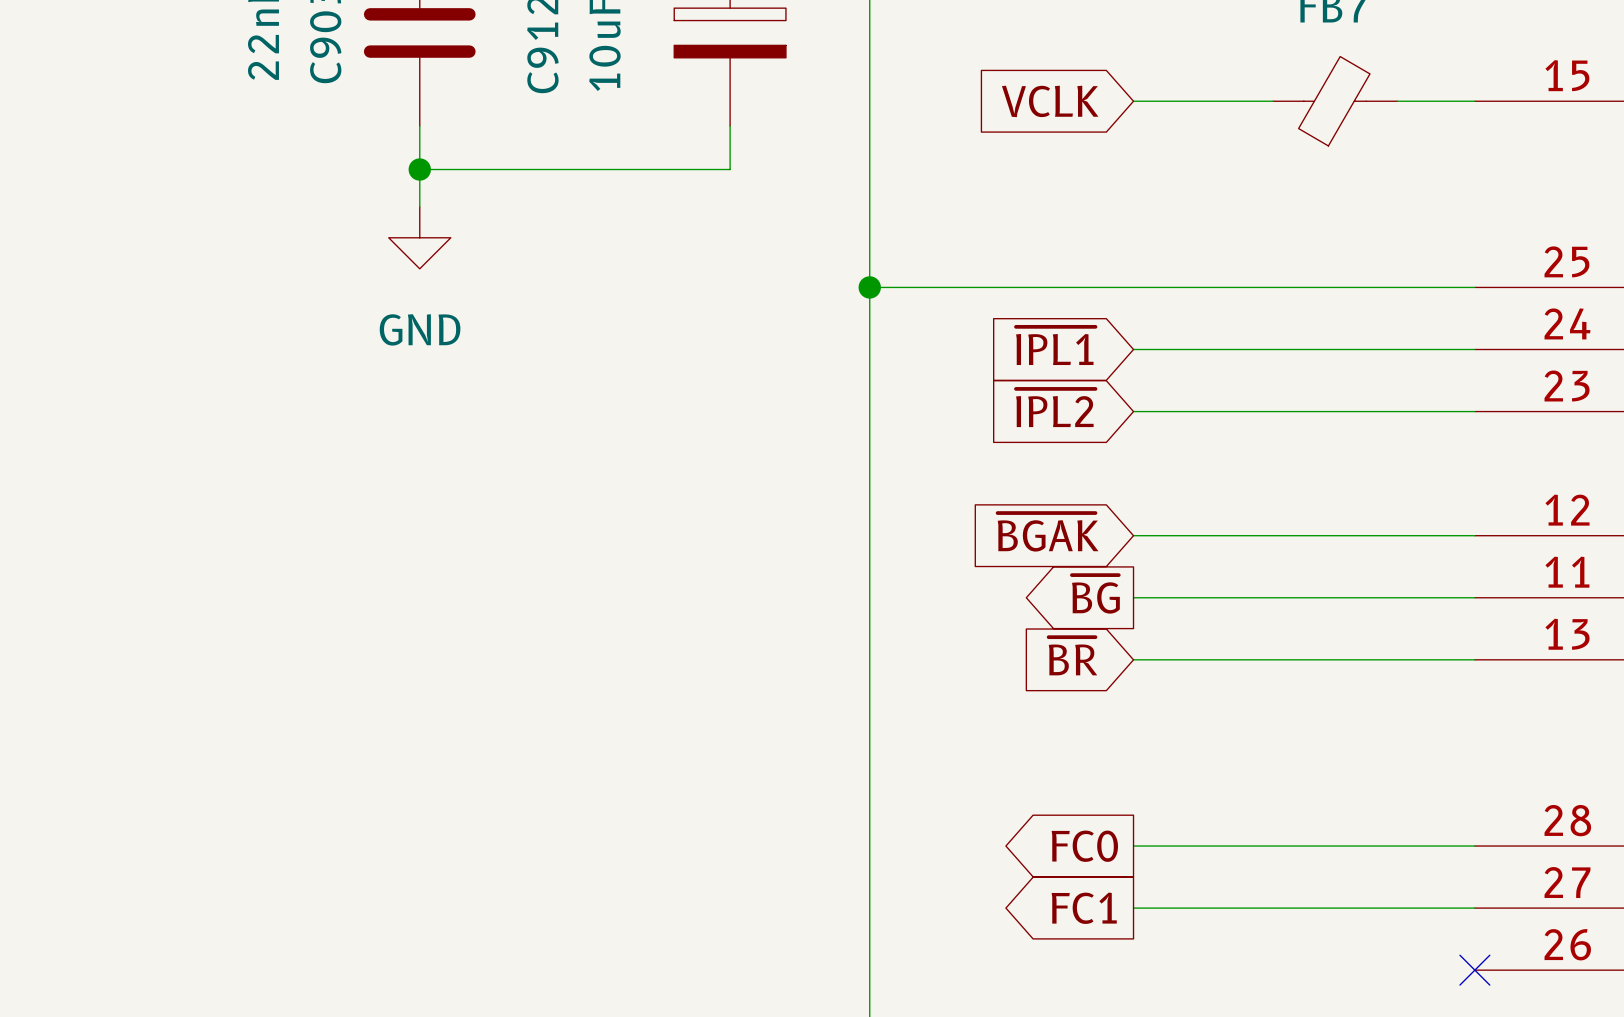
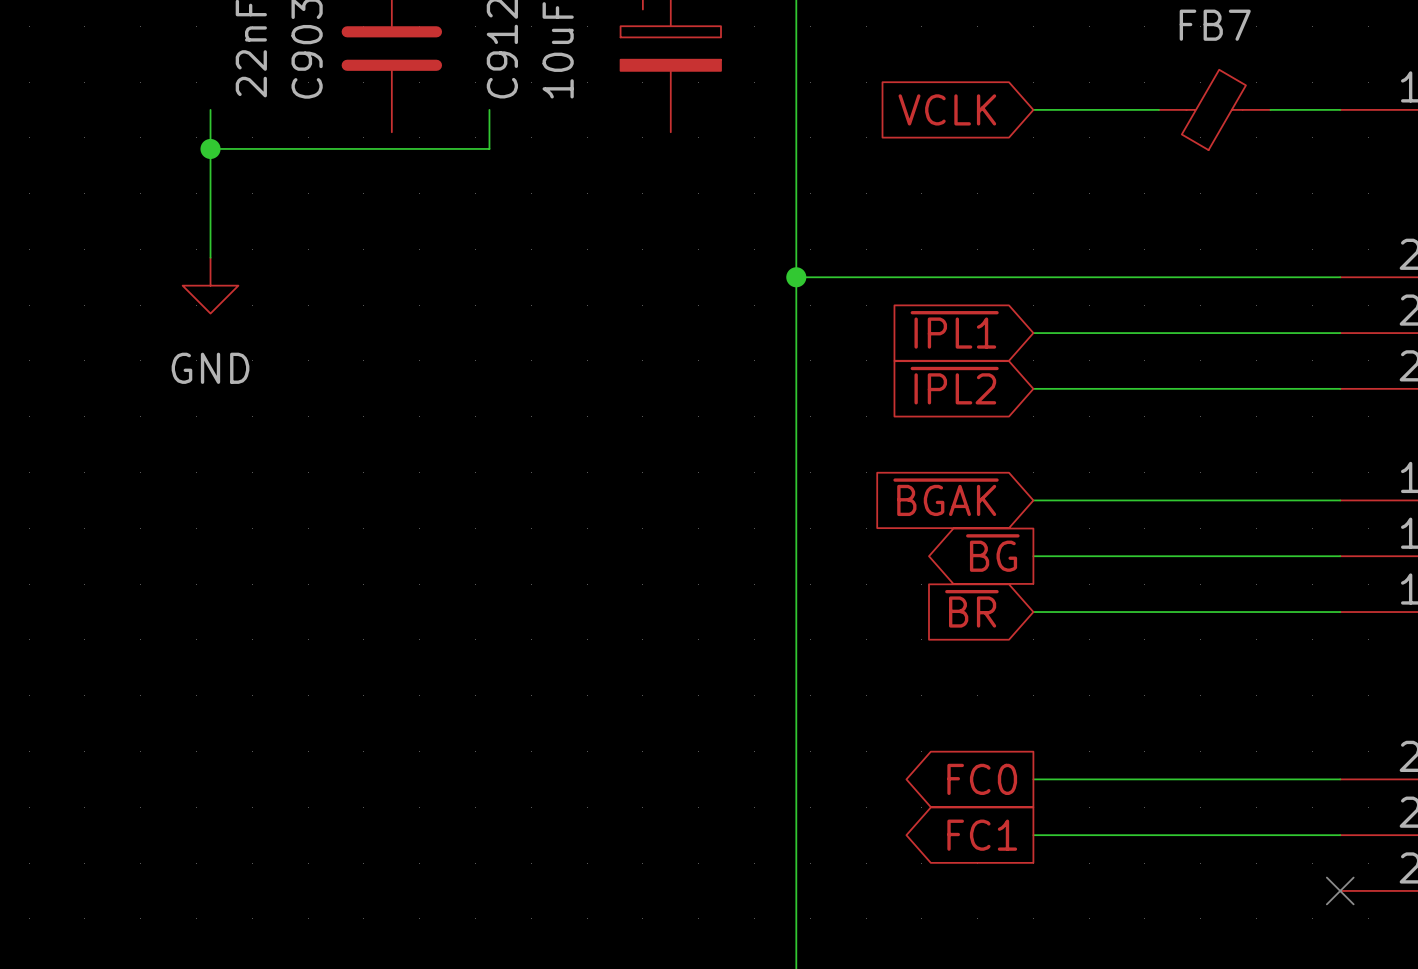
wire: none -> (210, 109) (210, 257)
wire: (419, 126) (419, 206) -> none
wire: (730, 126) (730, 169) (419, 169) -> (489, 109) (489, 148) (210, 148)
junction: none -> (210, 148)
junction: (419, 169) -> none
power symbol position: GND (419, 237) -> GND (210, 285)

